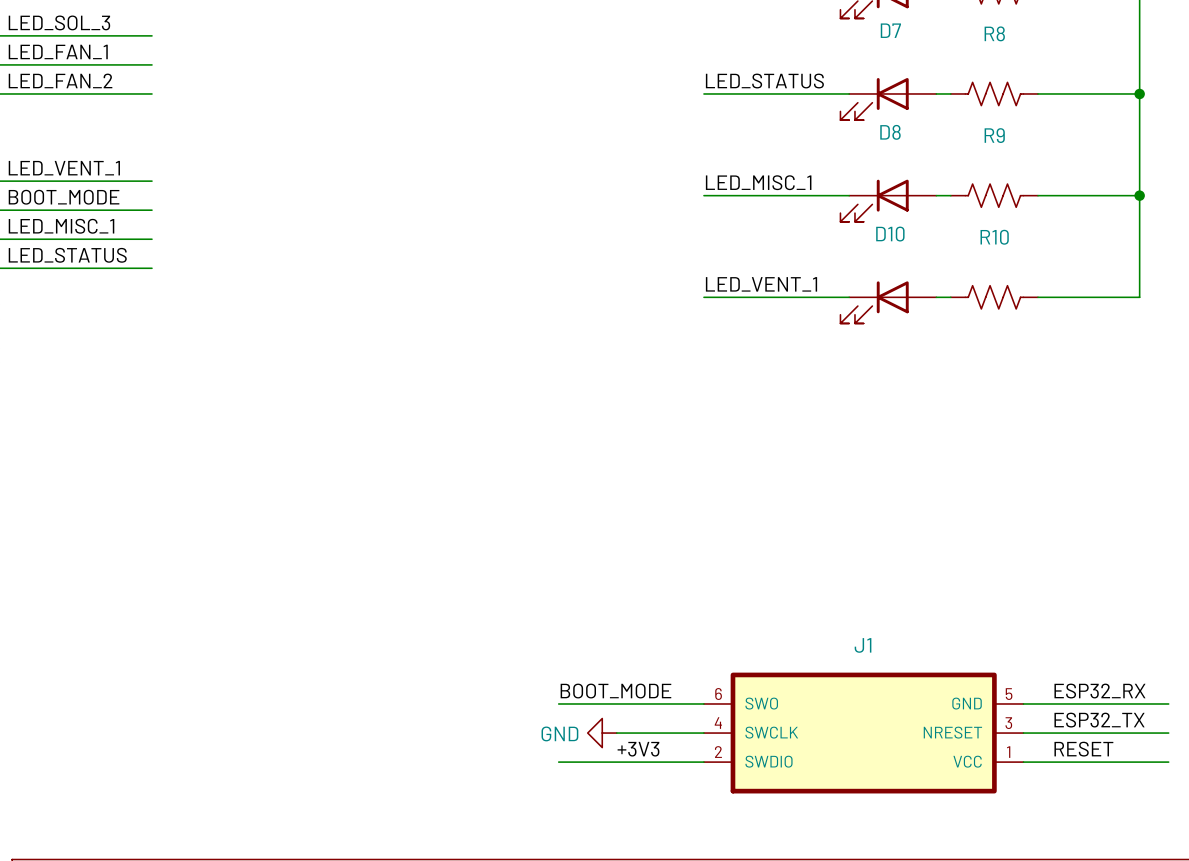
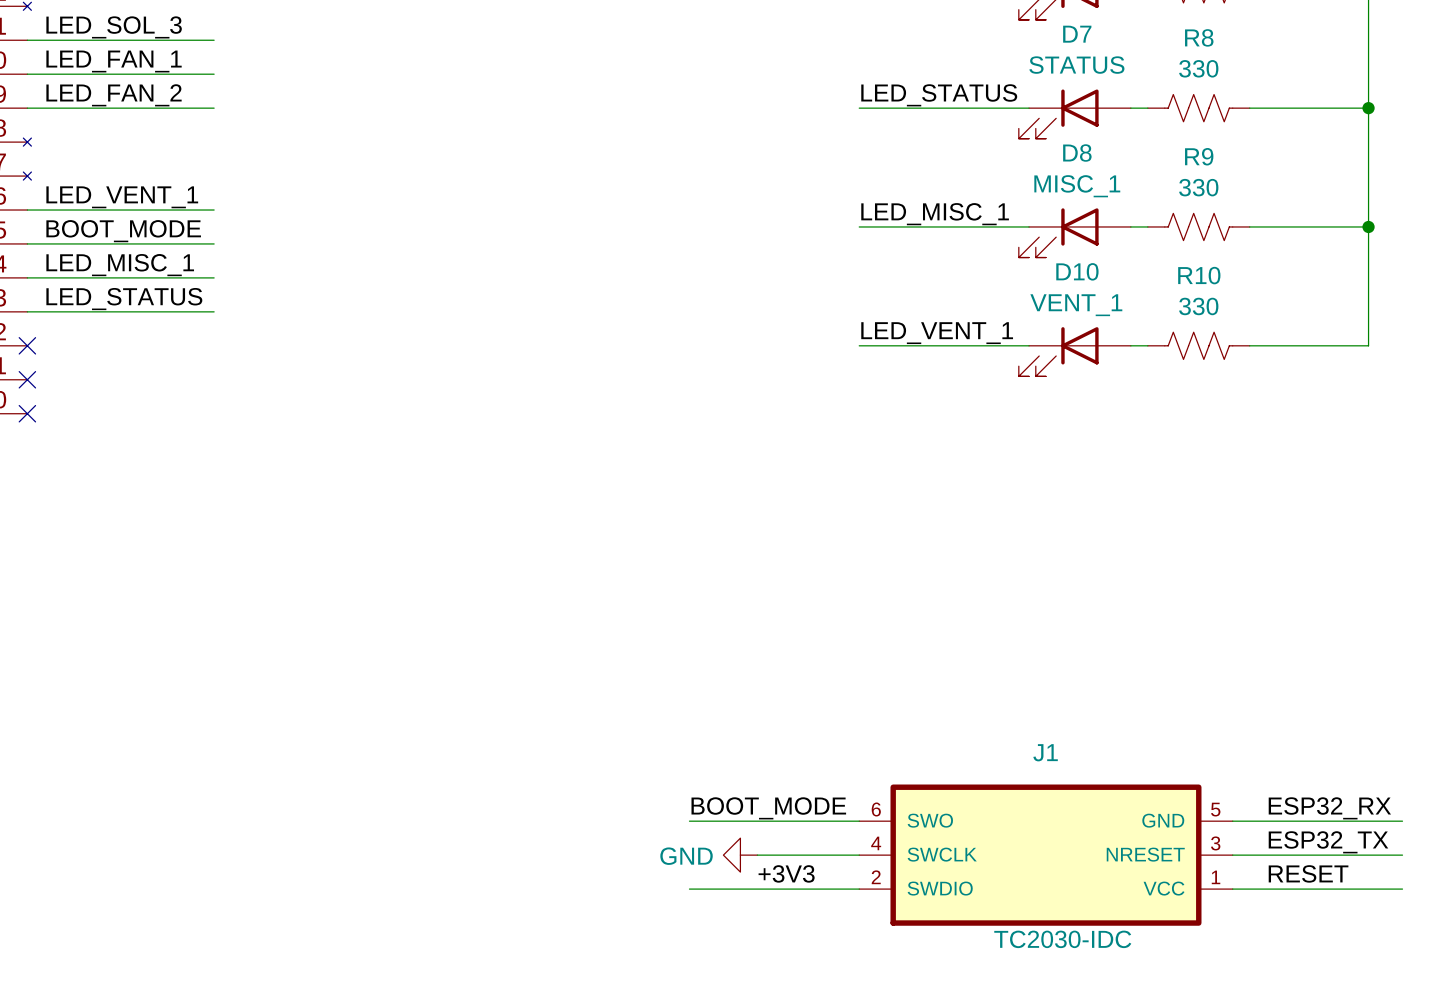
D7 value: none -> STATUS (1076, 65)
R8 value: none -> 330 (1198, 68)
D8 value: none -> MISC_1 (1077, 186)
R9 value: none -> 330 (1198, 187)
D10 value: none -> VENT_1 (1076, 305)
R10 value: none -> 330 (1198, 306)
J1 value: none -> TC2030-IDC (1062, 939)

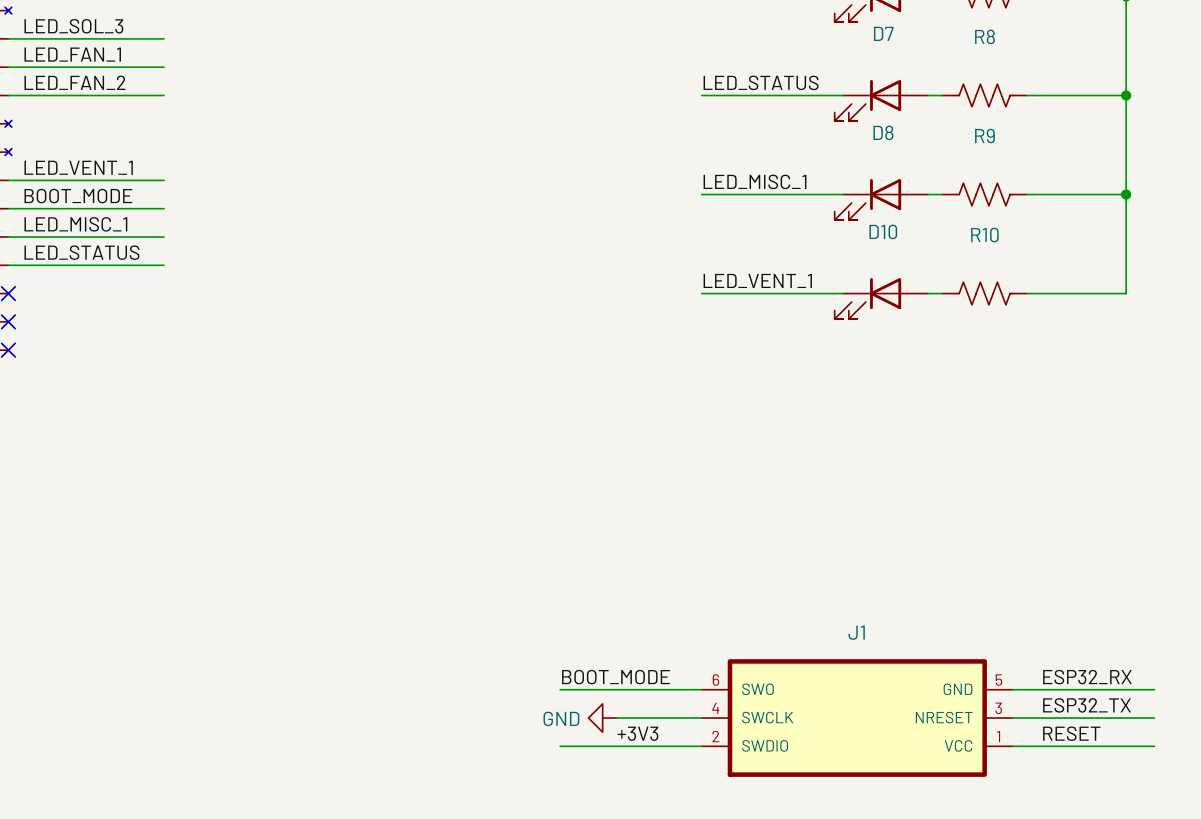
D7 value: STATUS (1076, 65) -> none
R8 value: 330 (1198, 68) -> none
D8 value: MISC_1 (1077, 186) -> none
R9 value: 330 (1198, 187) -> none
D10 value: VENT_1 (1076, 305) -> none
R10 value: 330 (1198, 306) -> none
J1 value: TC2030-IDC (1062, 939) -> none

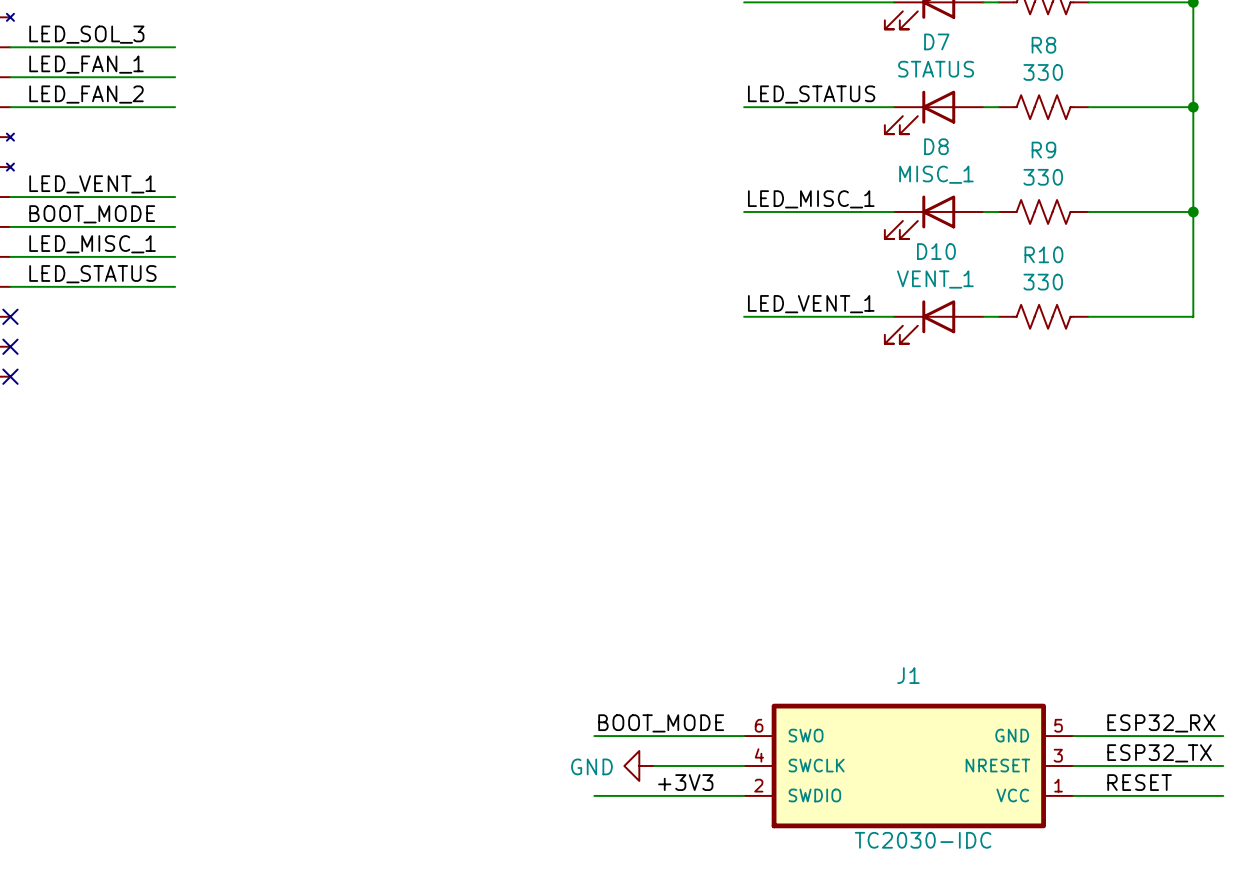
D7 value: none -> STATUS (936, 69)
R8 value: none -> 330 (1043, 72)
D8 value: none -> MISC_1 (936, 174)
R9 value: none -> 330 (1043, 177)
D10 value: none -> VENT_1 (935, 279)
R10 value: none -> 330 (1043, 282)
J1 value: none -> TC2030-IDC (923, 840)

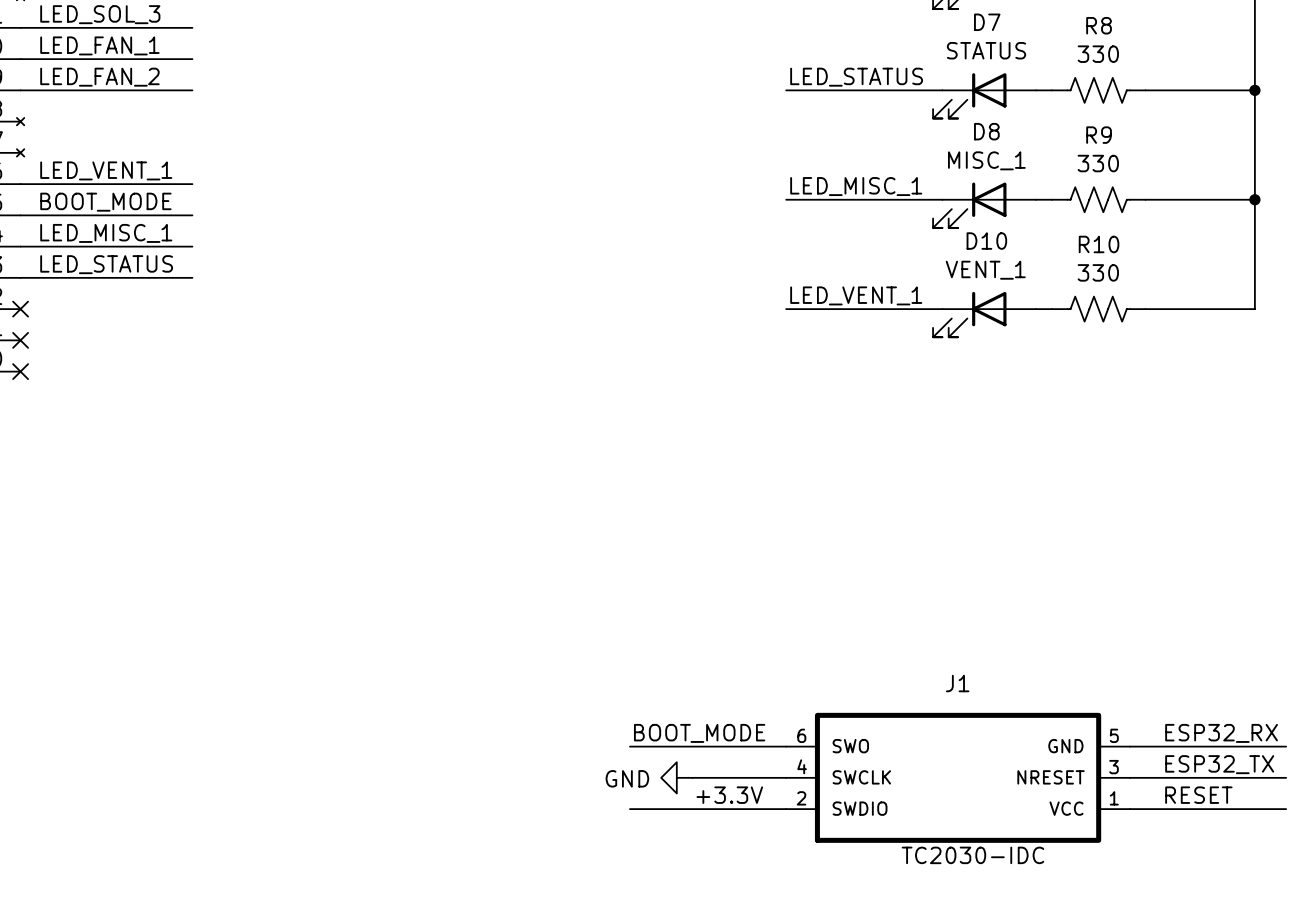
label: +3V3 (685, 782) -> +3.3V (729, 795)

